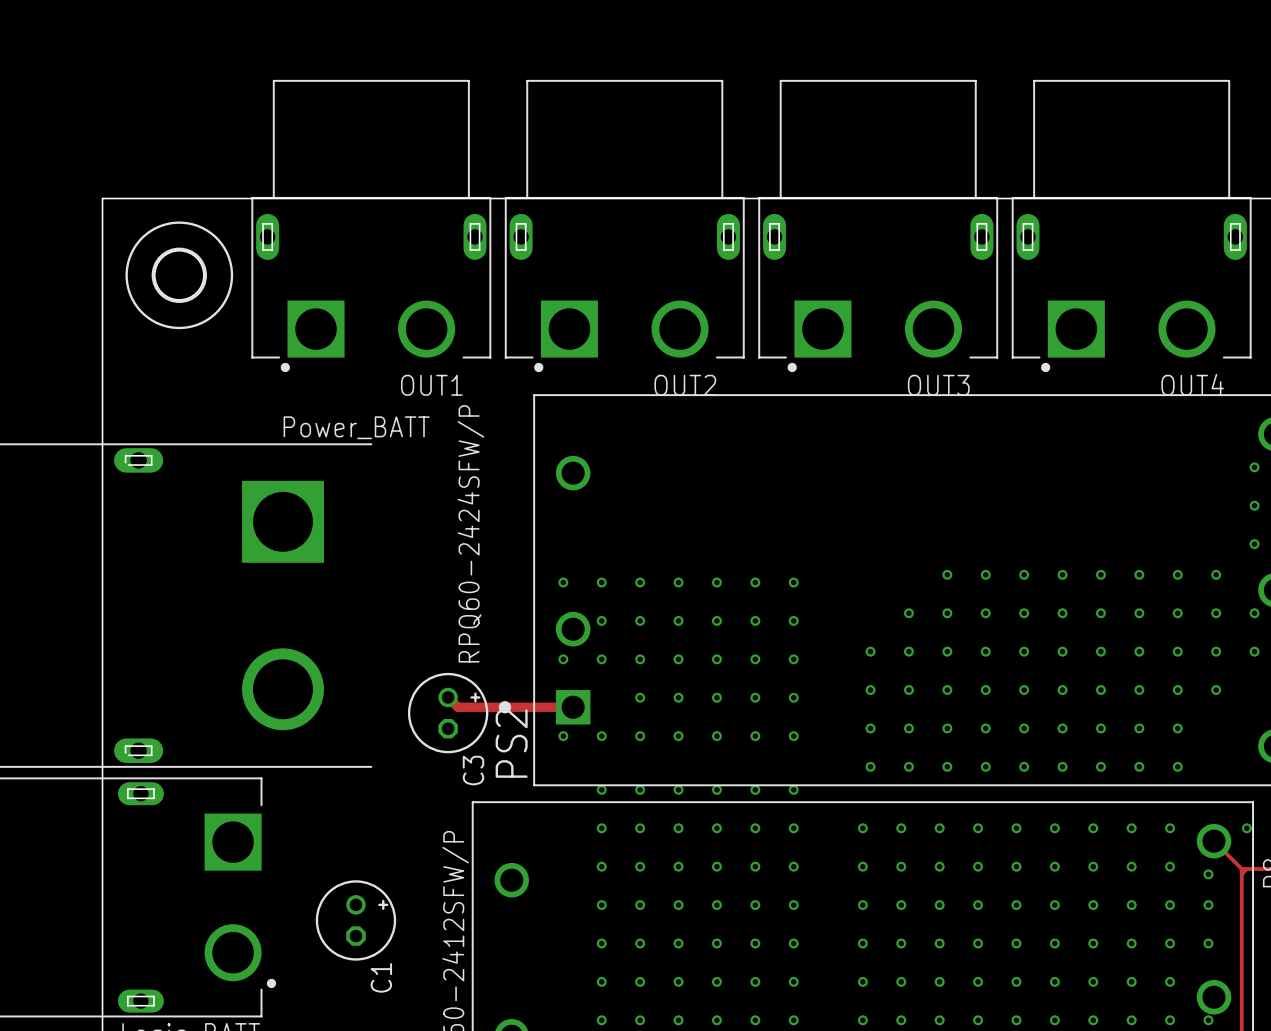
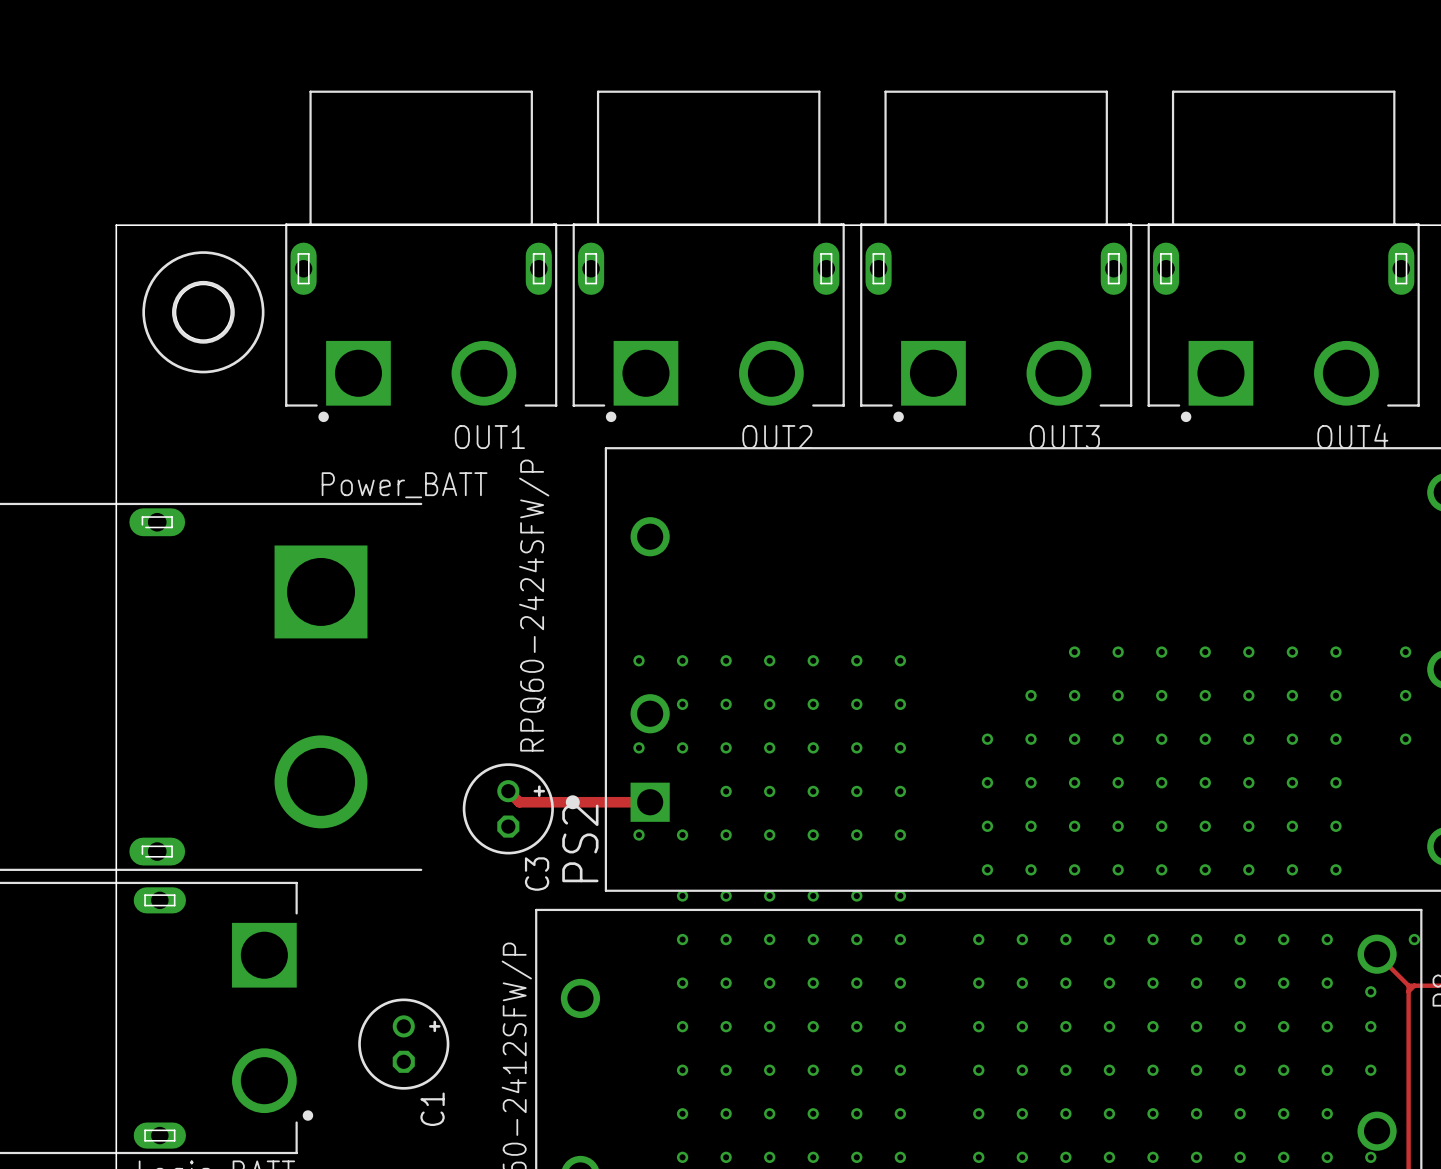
via: (1254, 467) -> none
via: (1254, 505) -> none
via: (1254, 544) -> none
via: (1216, 574) -> none
via: none -> (1405, 652)
via: (1216, 613) -> none
via: none -> (1405, 695)
via: (1254, 613) -> none
via: (1216, 651) -> none
via: none -> (1405, 739)
via: (1254, 651) -> none
via: (1216, 690) -> none

